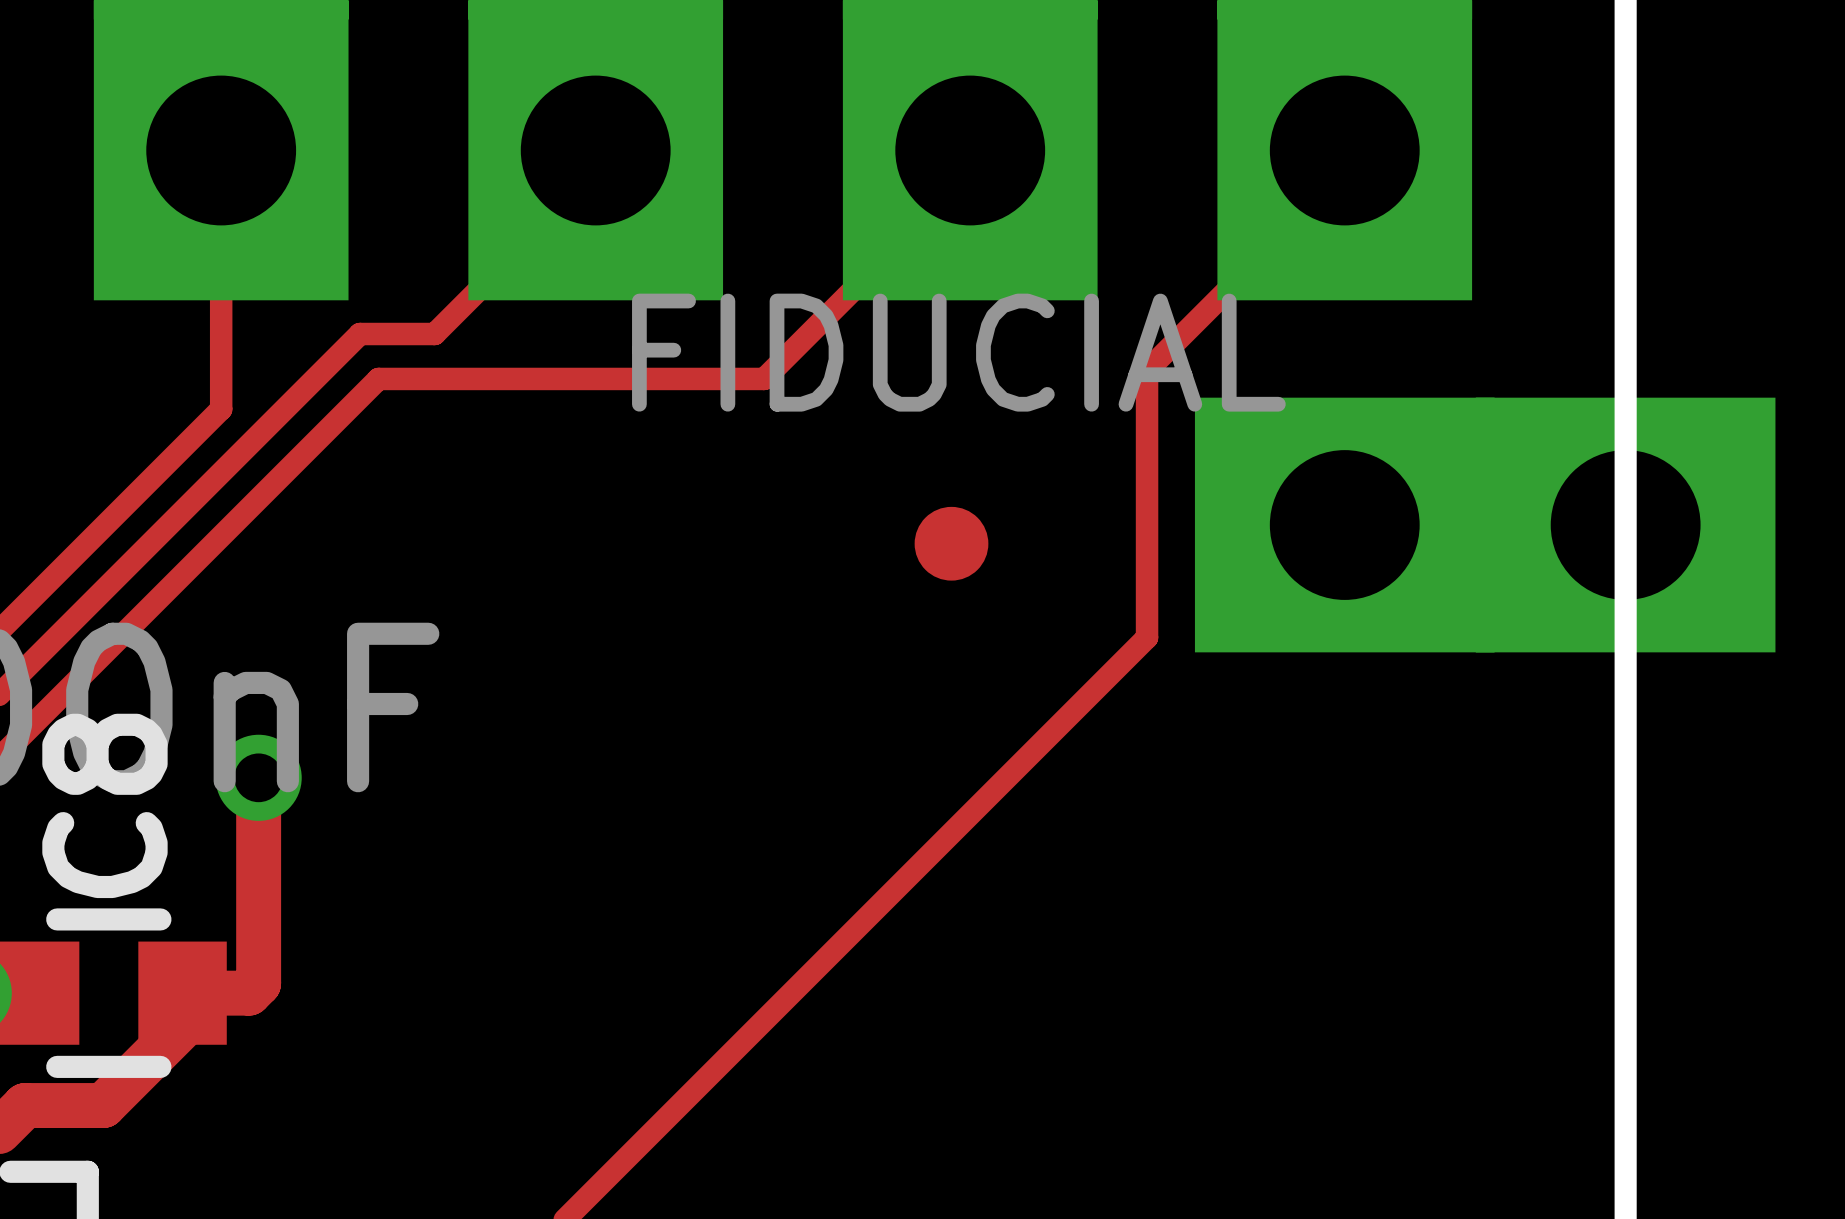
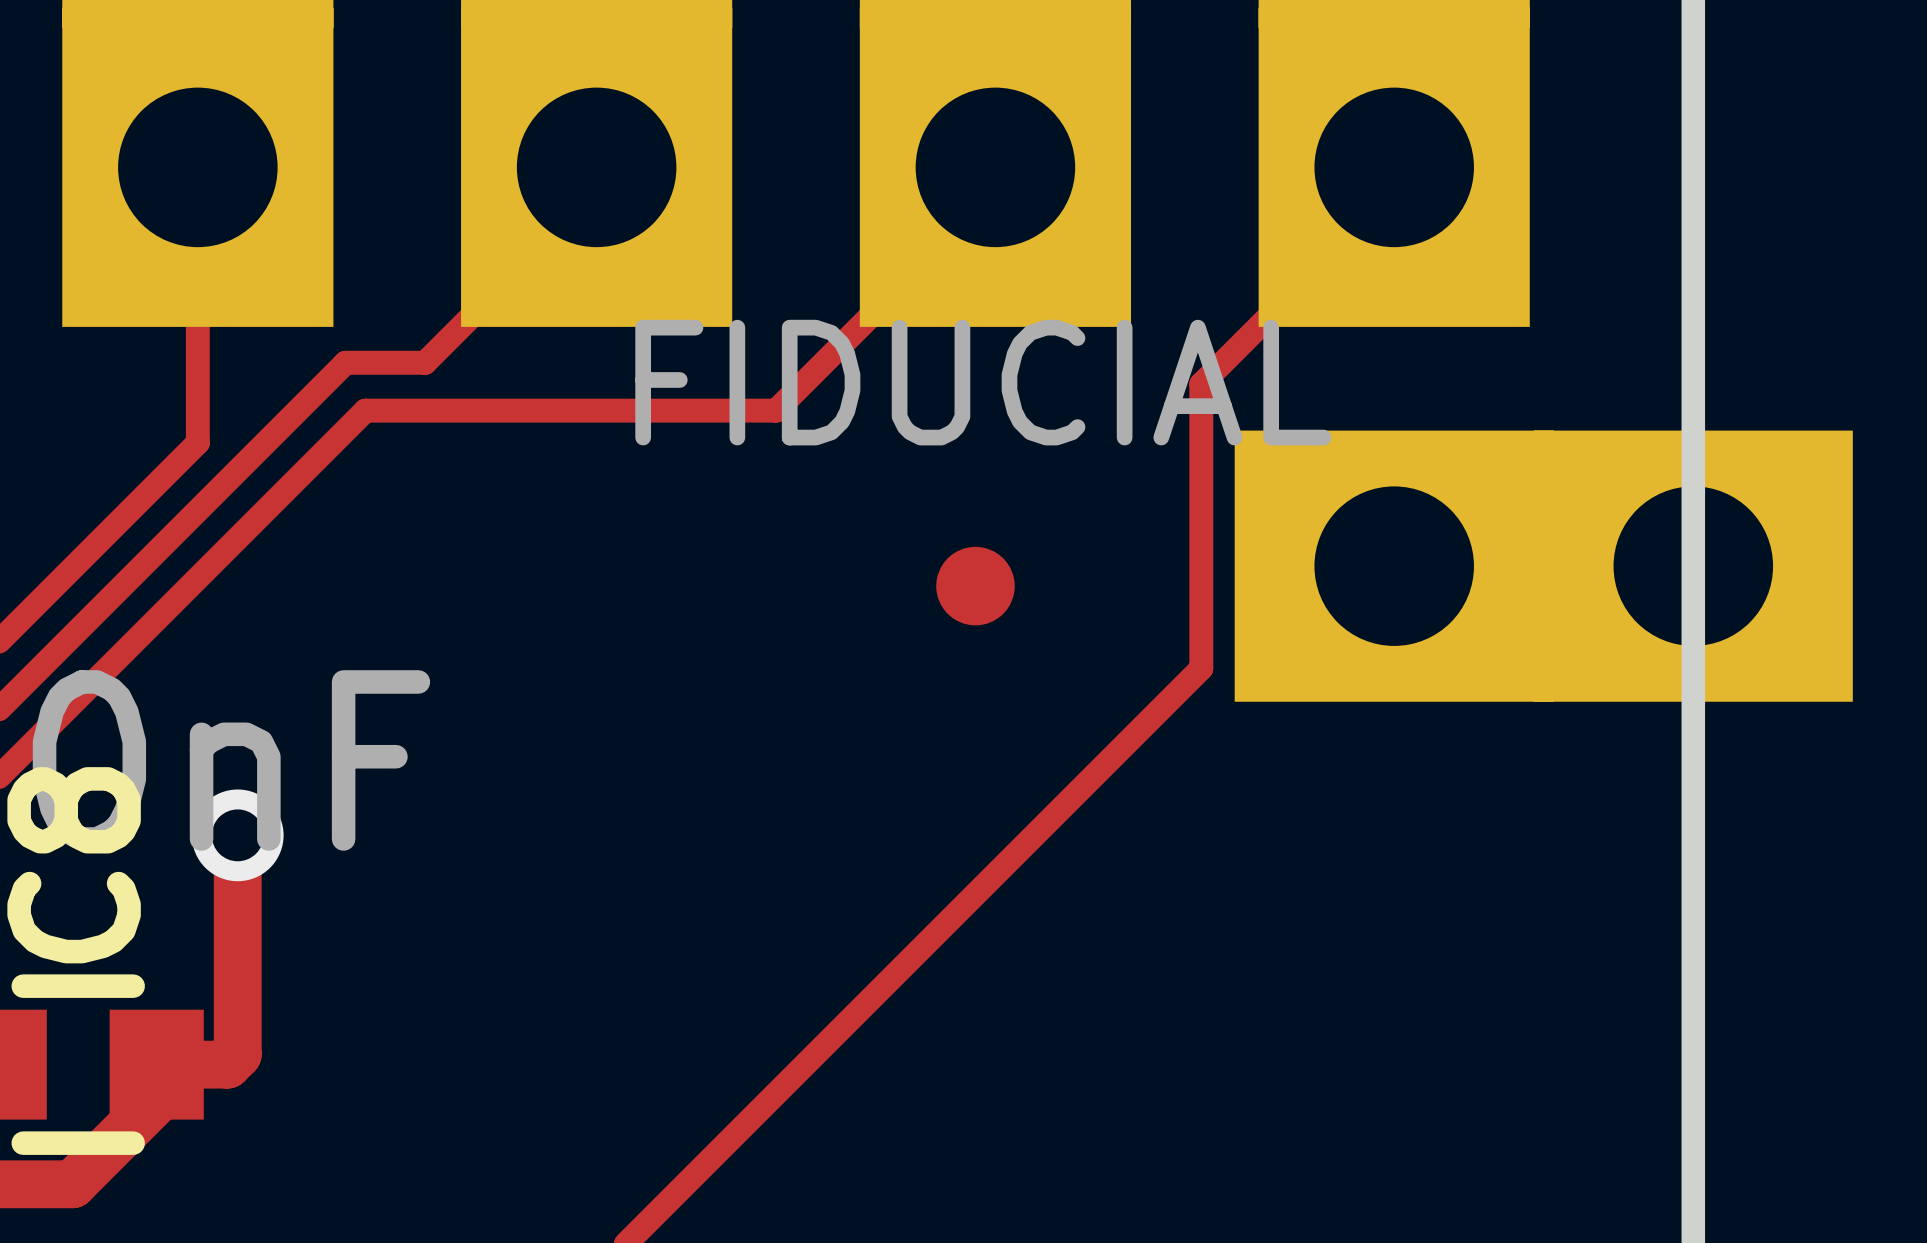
track: (1163, 354) (1147, 370) (1147, 637) -> (1201, 384) (1201, 668) (1183, 686)

